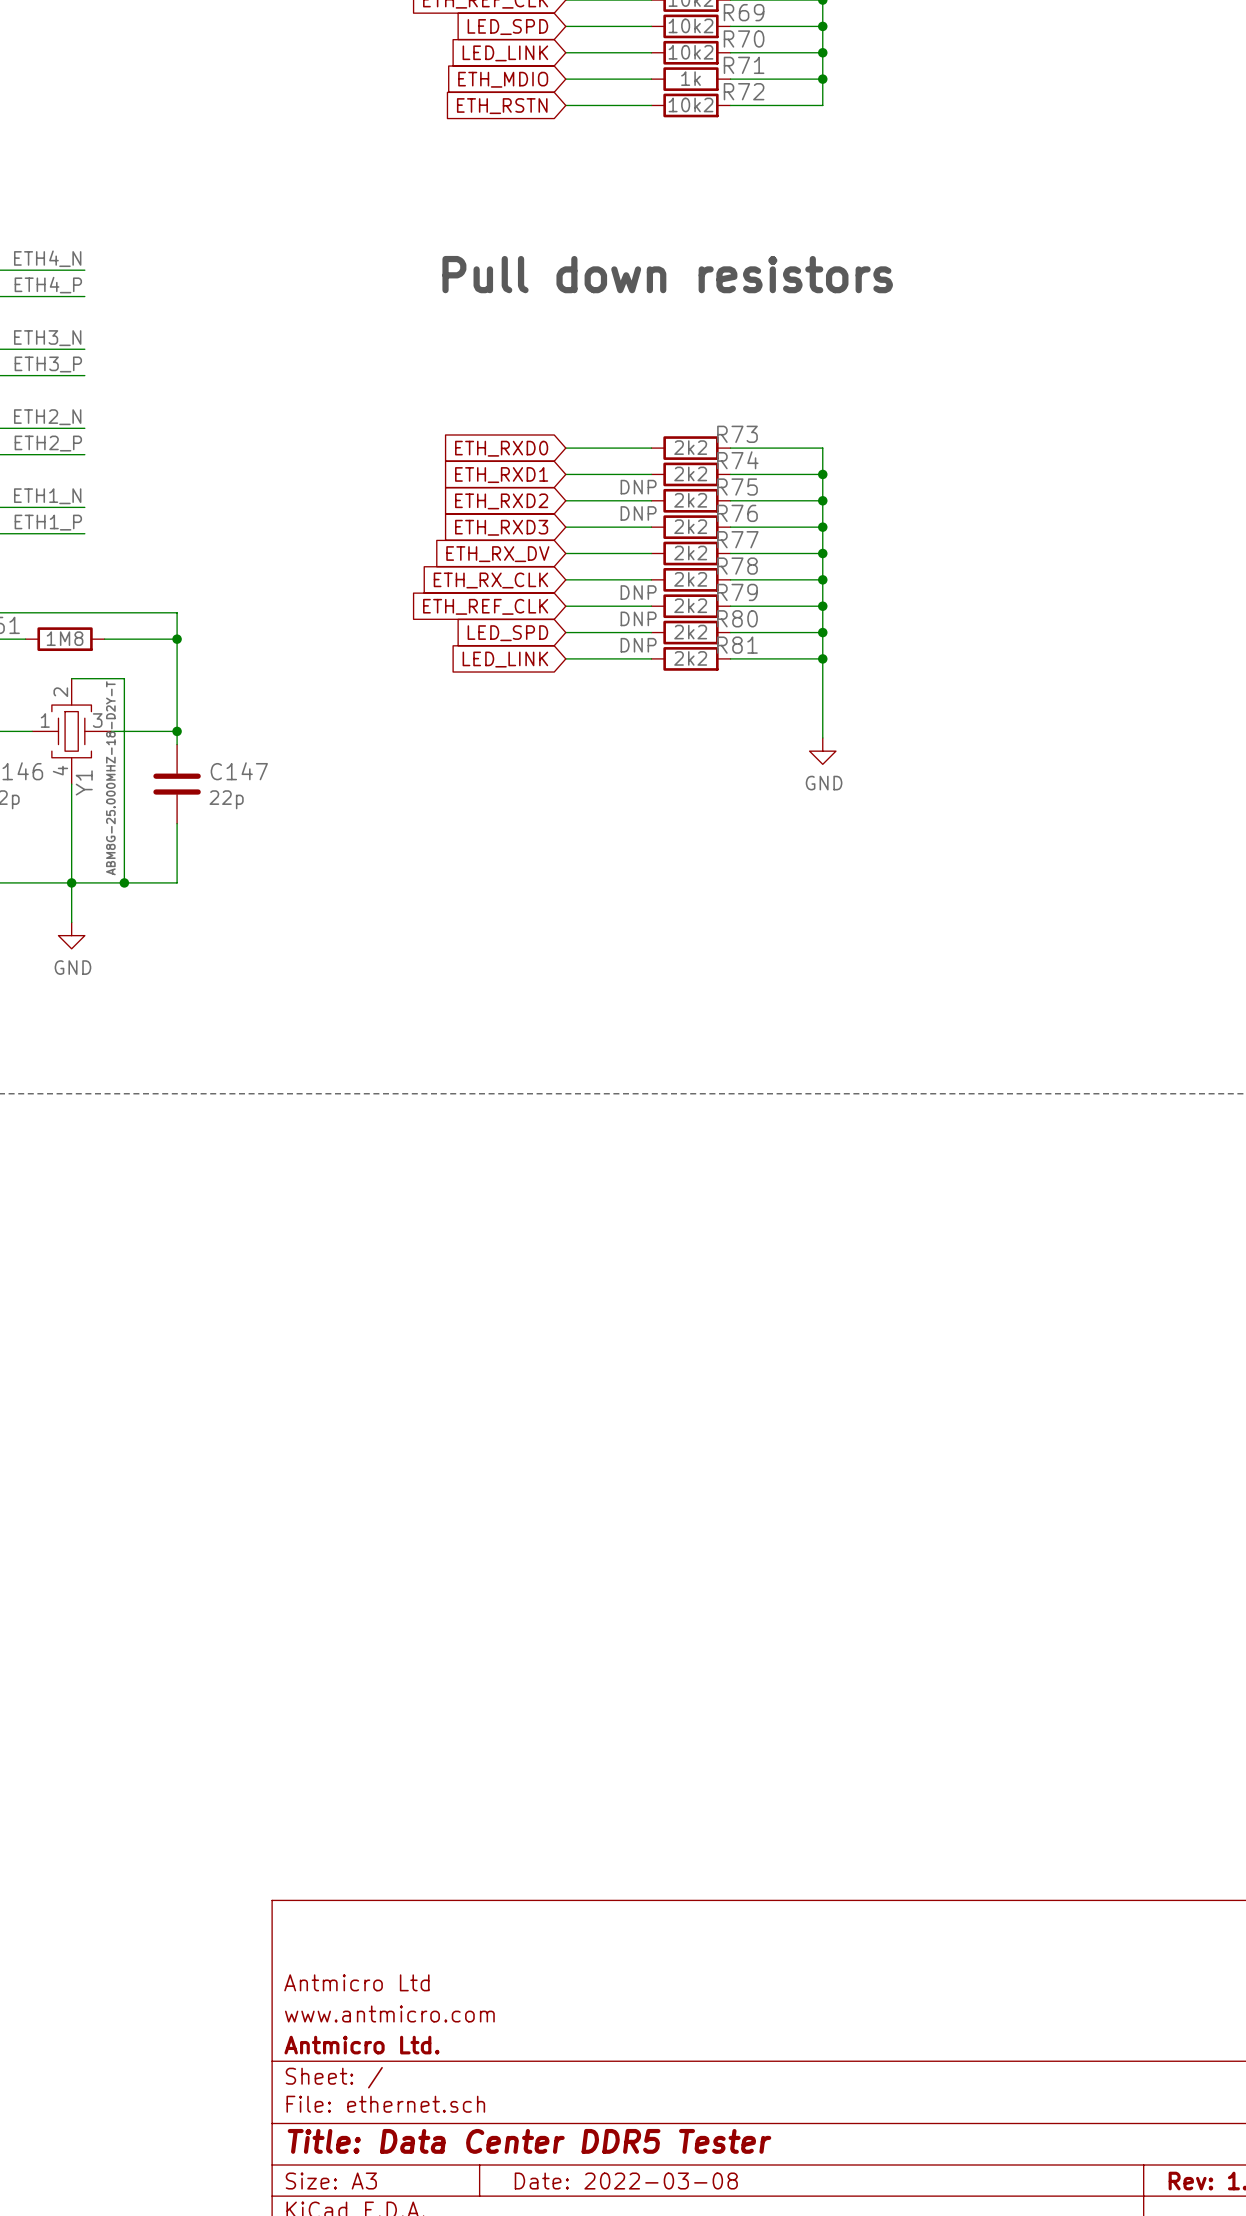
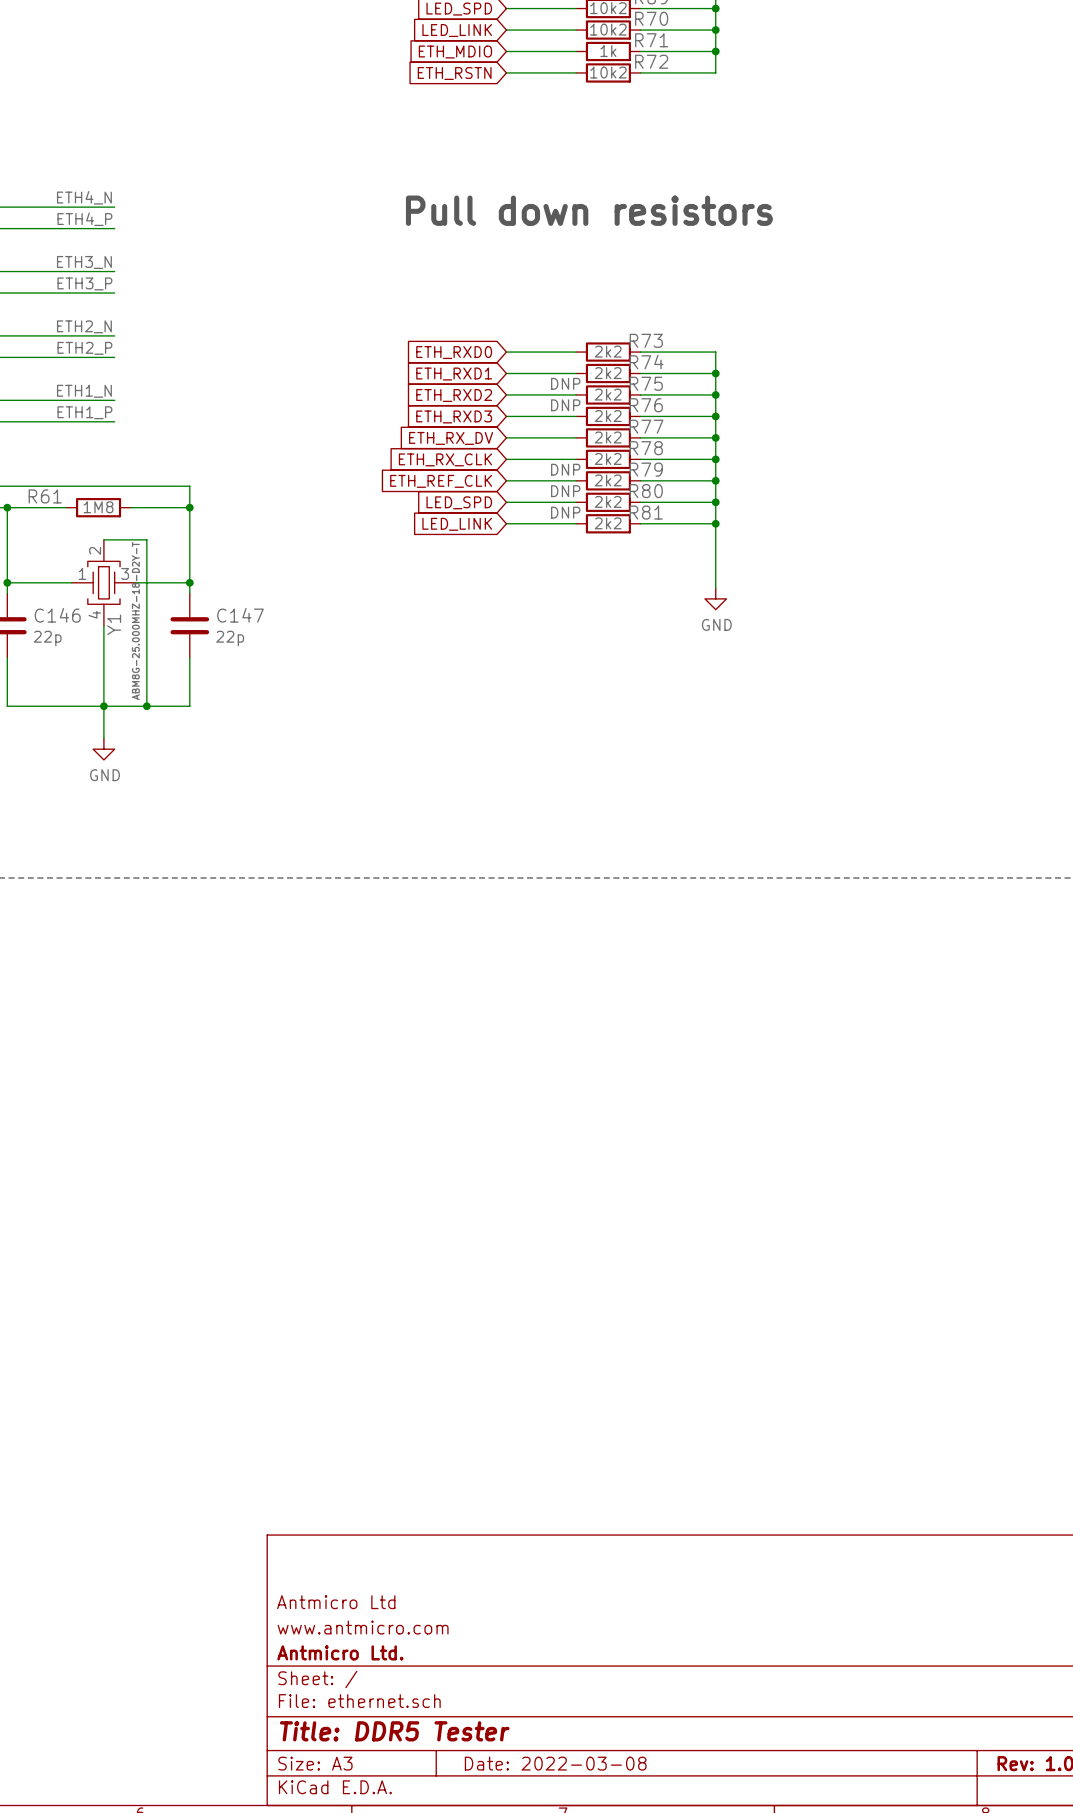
title block: Title: Data Center DDR5 Tester (529, 2141) -> Title: DDR5 Tester (394, 1731)

